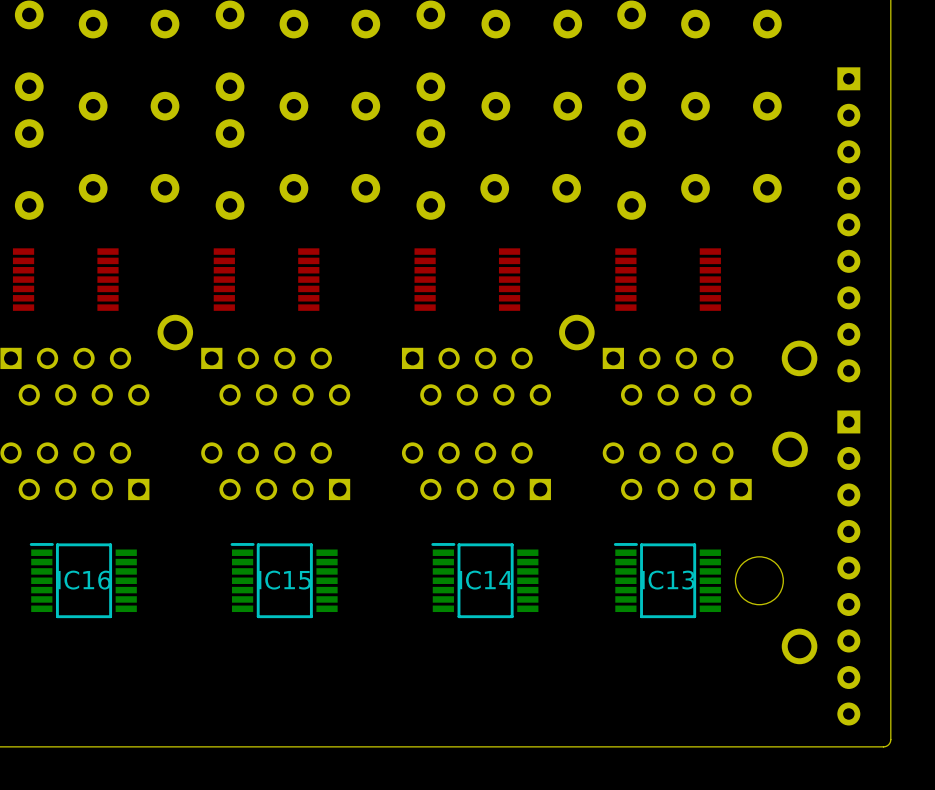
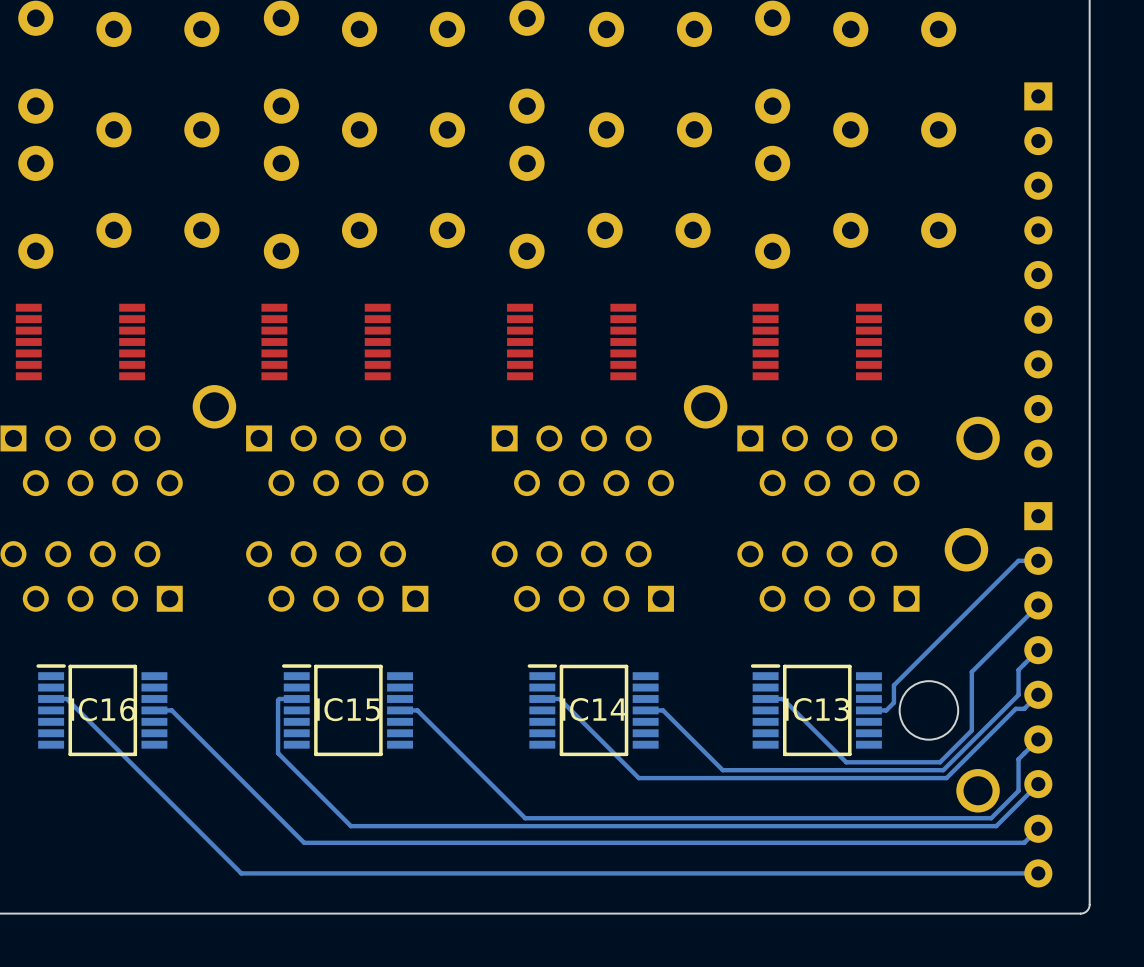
bottom track: none -> (1038, 560) (1018, 560) (893, 685) (893, 702) (886, 710) (868, 710)
bottom track: none -> (1038, 605) (971, 671) (971, 730) (940, 762) (846, 762) (782, 698) (765, 698)
bottom track: none -> (1038, 650) (1018, 669) (1018, 694) (943, 770) (722, 770) (663, 710) (645, 710)
bottom track: none -> (1038, 694) (1024, 708) (1015, 708) (946, 778) (638, 778) (559, 698) (542, 698)
bottom track: none -> (51, 698) (66, 698) (241, 873) (1038, 873)
bottom track: none -> (296, 698) (278, 700) (278, 753) (350, 826) (996, 826) (1038, 784)
bottom track: none -> (154, 710) (171, 710) (304, 842) (1024, 842) (1038, 828)
bottom track: none -> (400, 710) (417, 710) (525, 818) (991, 818) (1018, 790) (1018, 759) (1038, 739)

